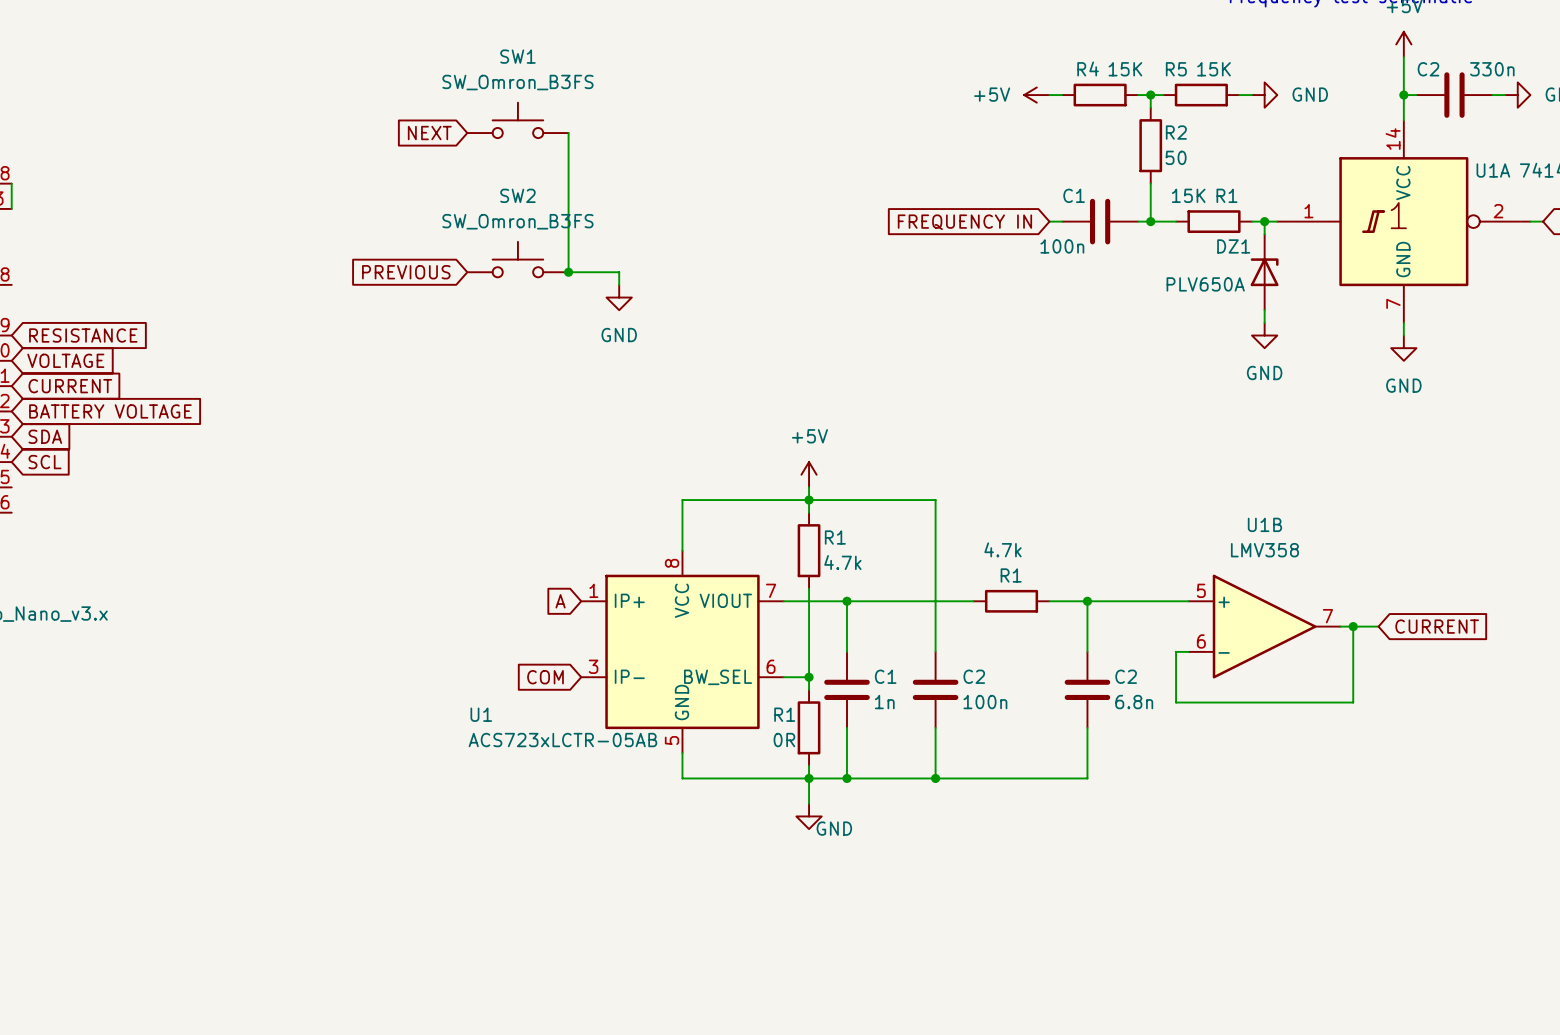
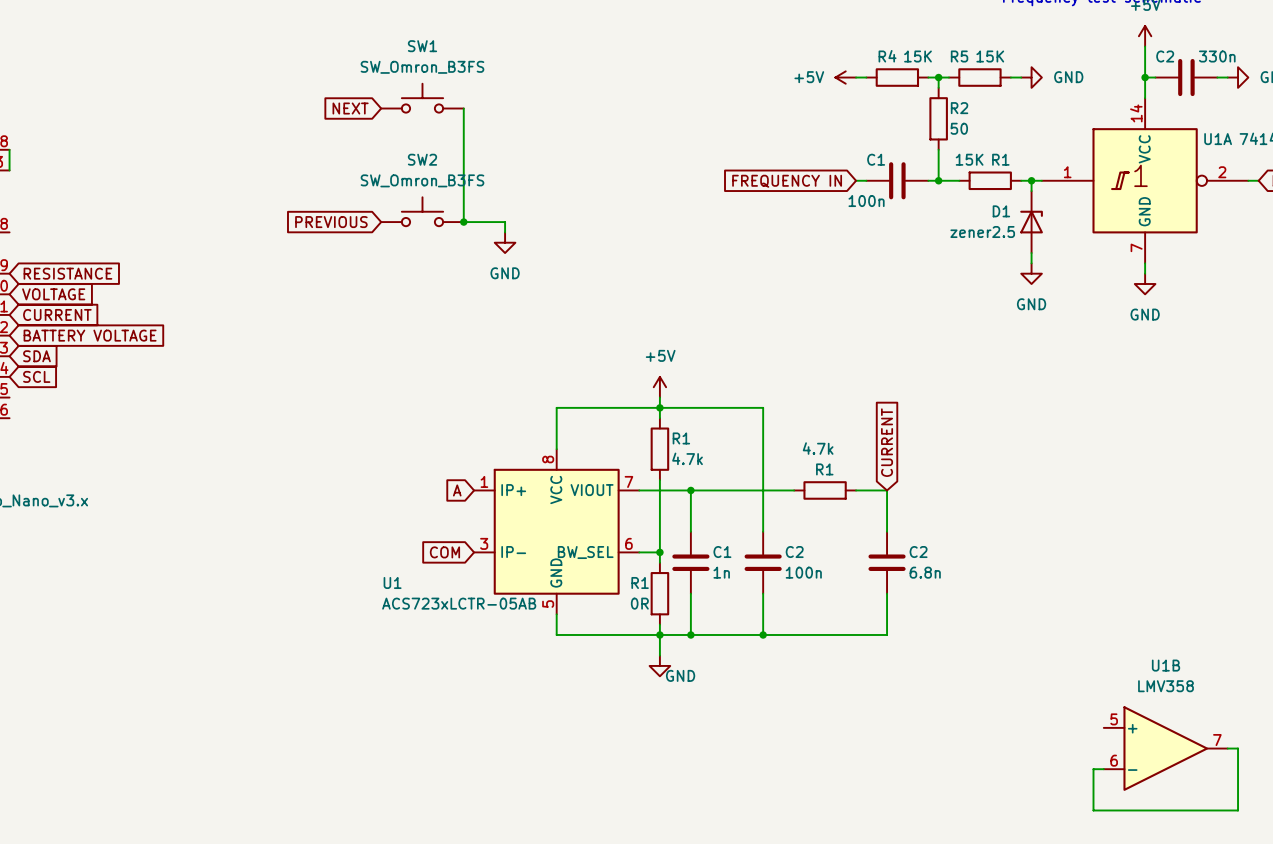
DZ1 name: DZ1 (1233, 246) -> D1 (1001, 211)
DZ1 value: PLV650A (1205, 284) -> zener2.5 (982, 232)
global label: none -> CURRENT (887, 442)
wire: (1087, 601) (1188, 601) -> none
junction: (1087, 601) -> none
U1B position: (1264, 626) -> (1165, 748)
wire: (1340, 626) (1378, 626) -> none
wire: (1353, 626) (1353, 702) (1176, 702) (1176, 651) (1188, 651) -> none
junction: (1353, 626) -> none
global label: CURRENT (1437, 626) -> none
wire: none -> (1227, 748) (1238, 748) (1238, 810) (1093, 810) (1093, 769) (1103, 769)

